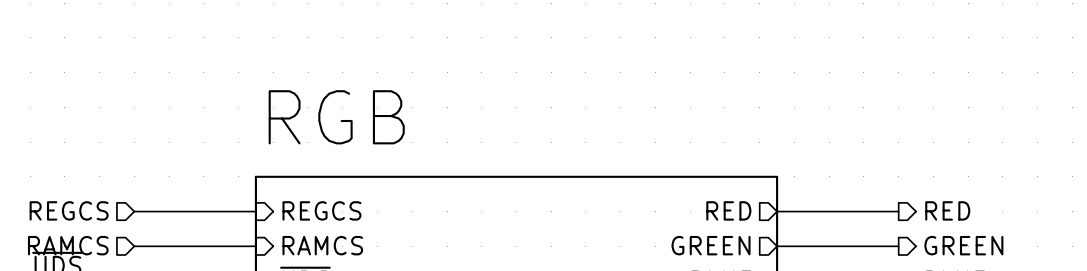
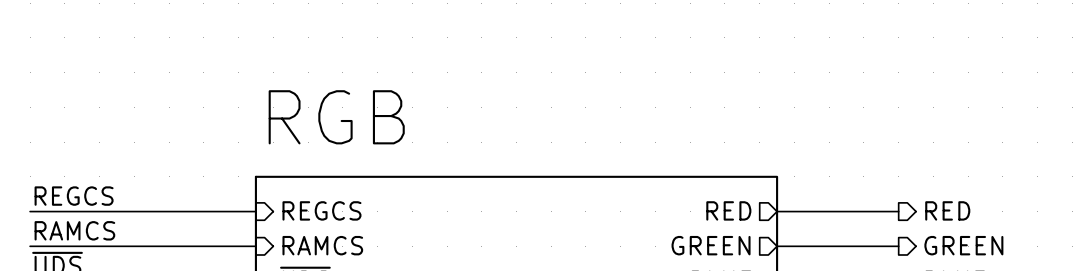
label: none -> REGCS (74, 196)
hierarchical label: REGCS (69, 210) -> none
wire: none -> (30, 211) (134, 211)
label: none -> RAMCS (74, 230)
hierarchical label: RAMCS (68, 245) -> none
wire: none -> (30, 246) (134, 246)

